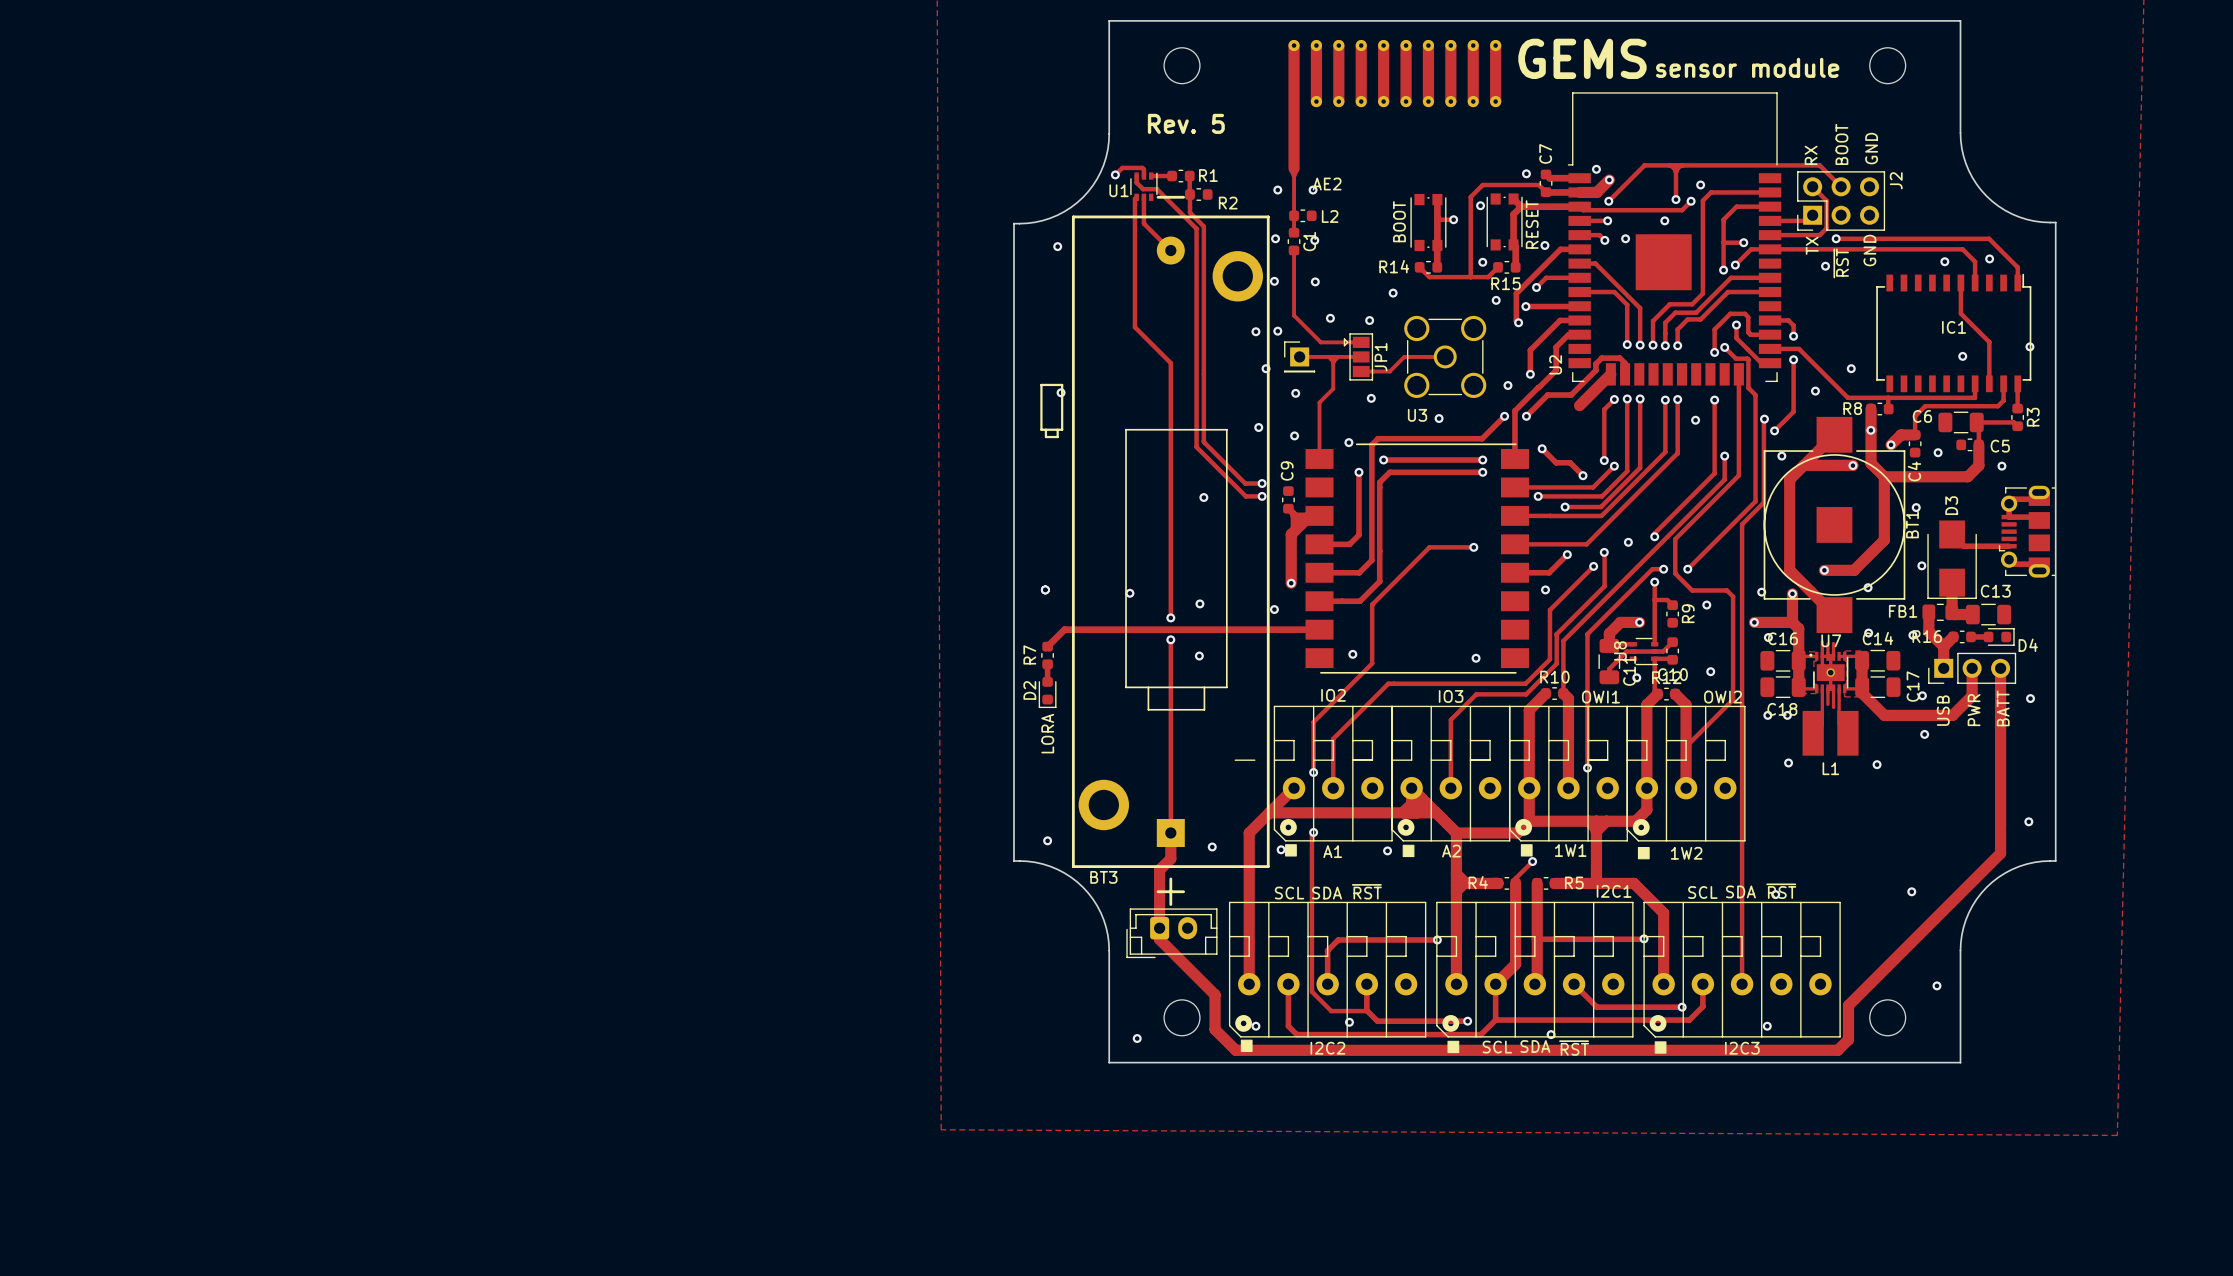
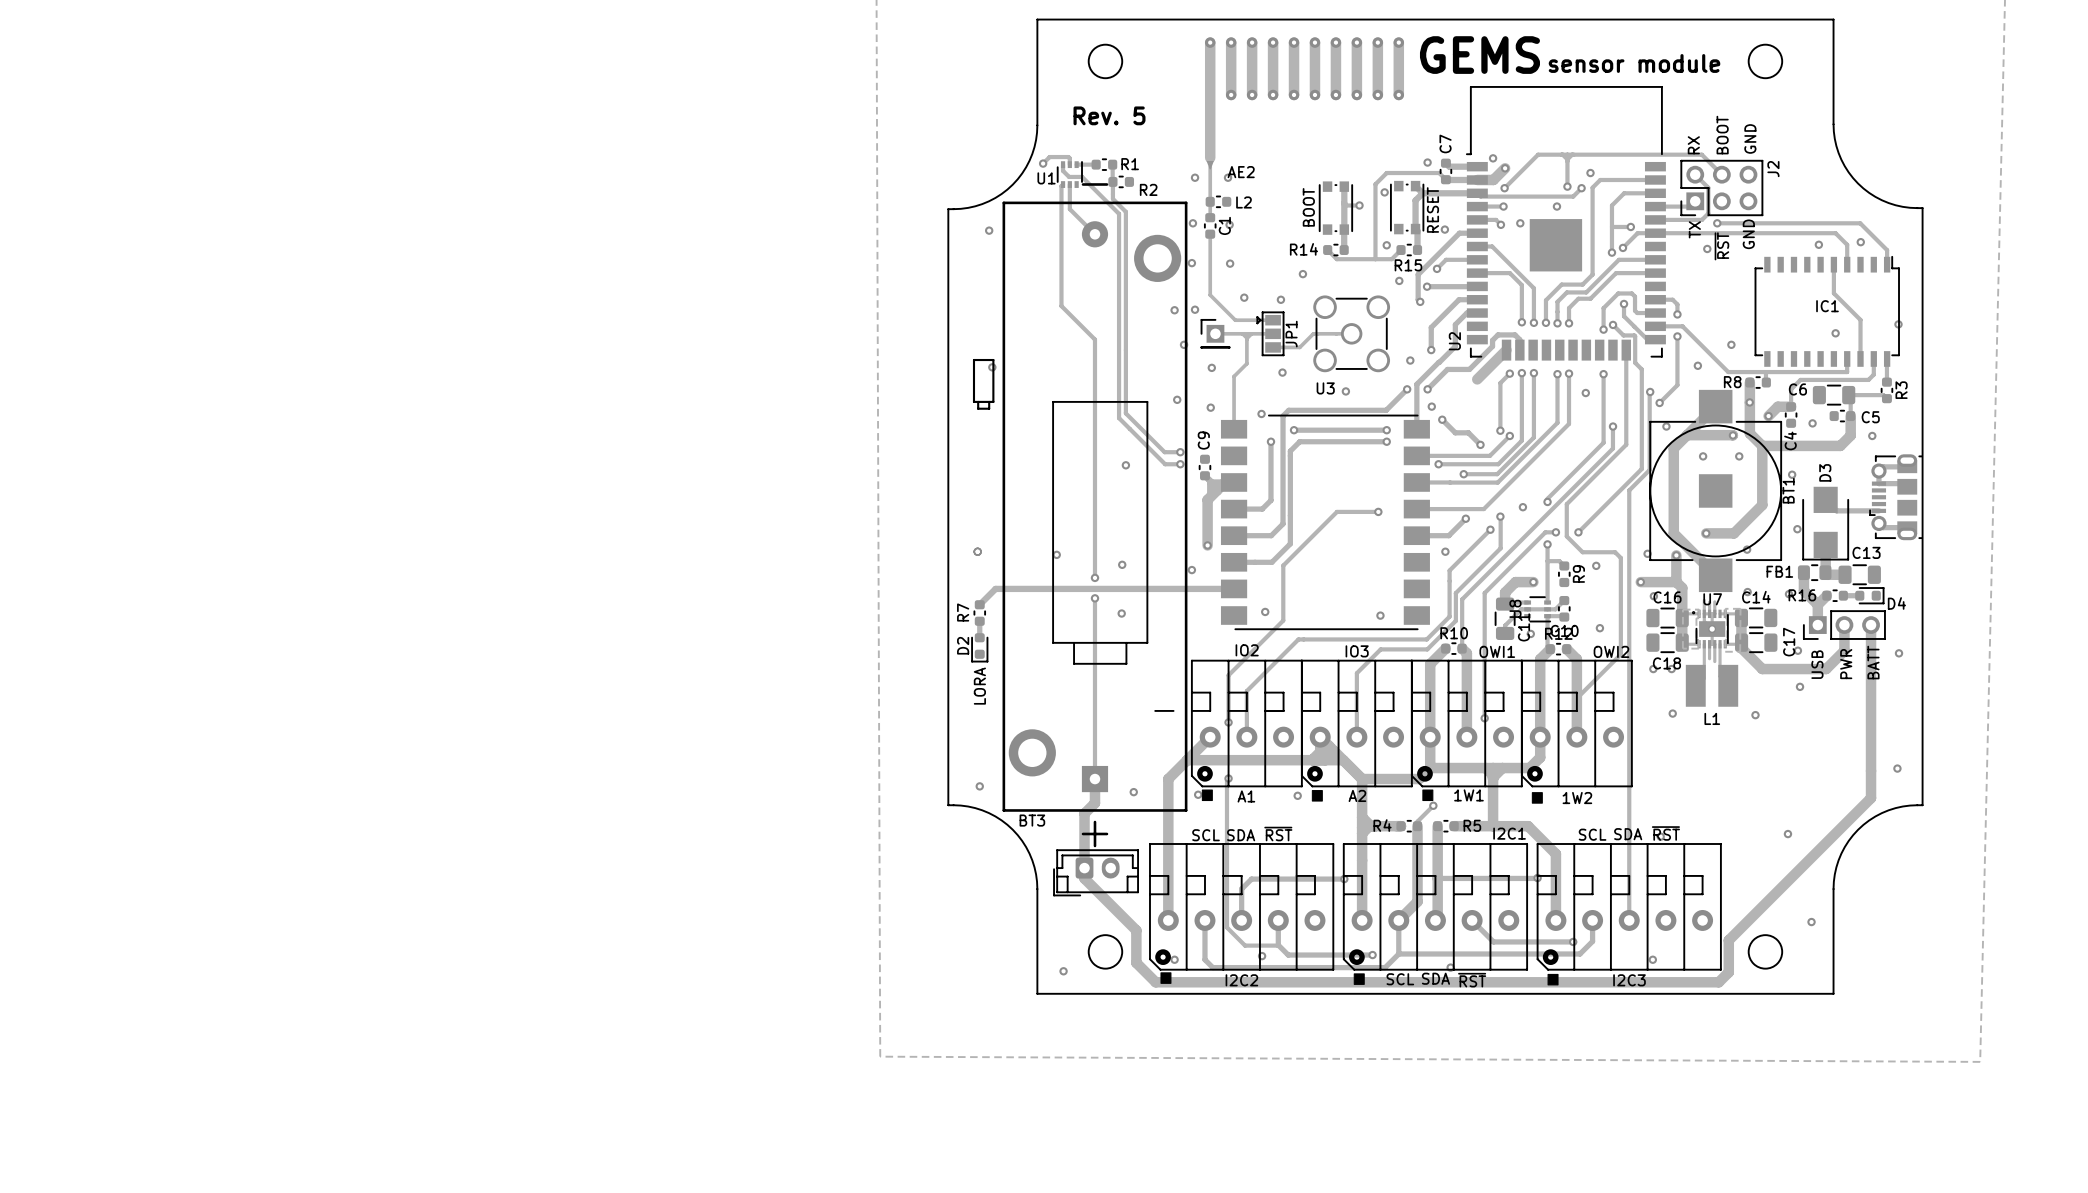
via: none -> (1431, 406)
via: none -> (1703, 456)
via: none -> (1739, 456)

